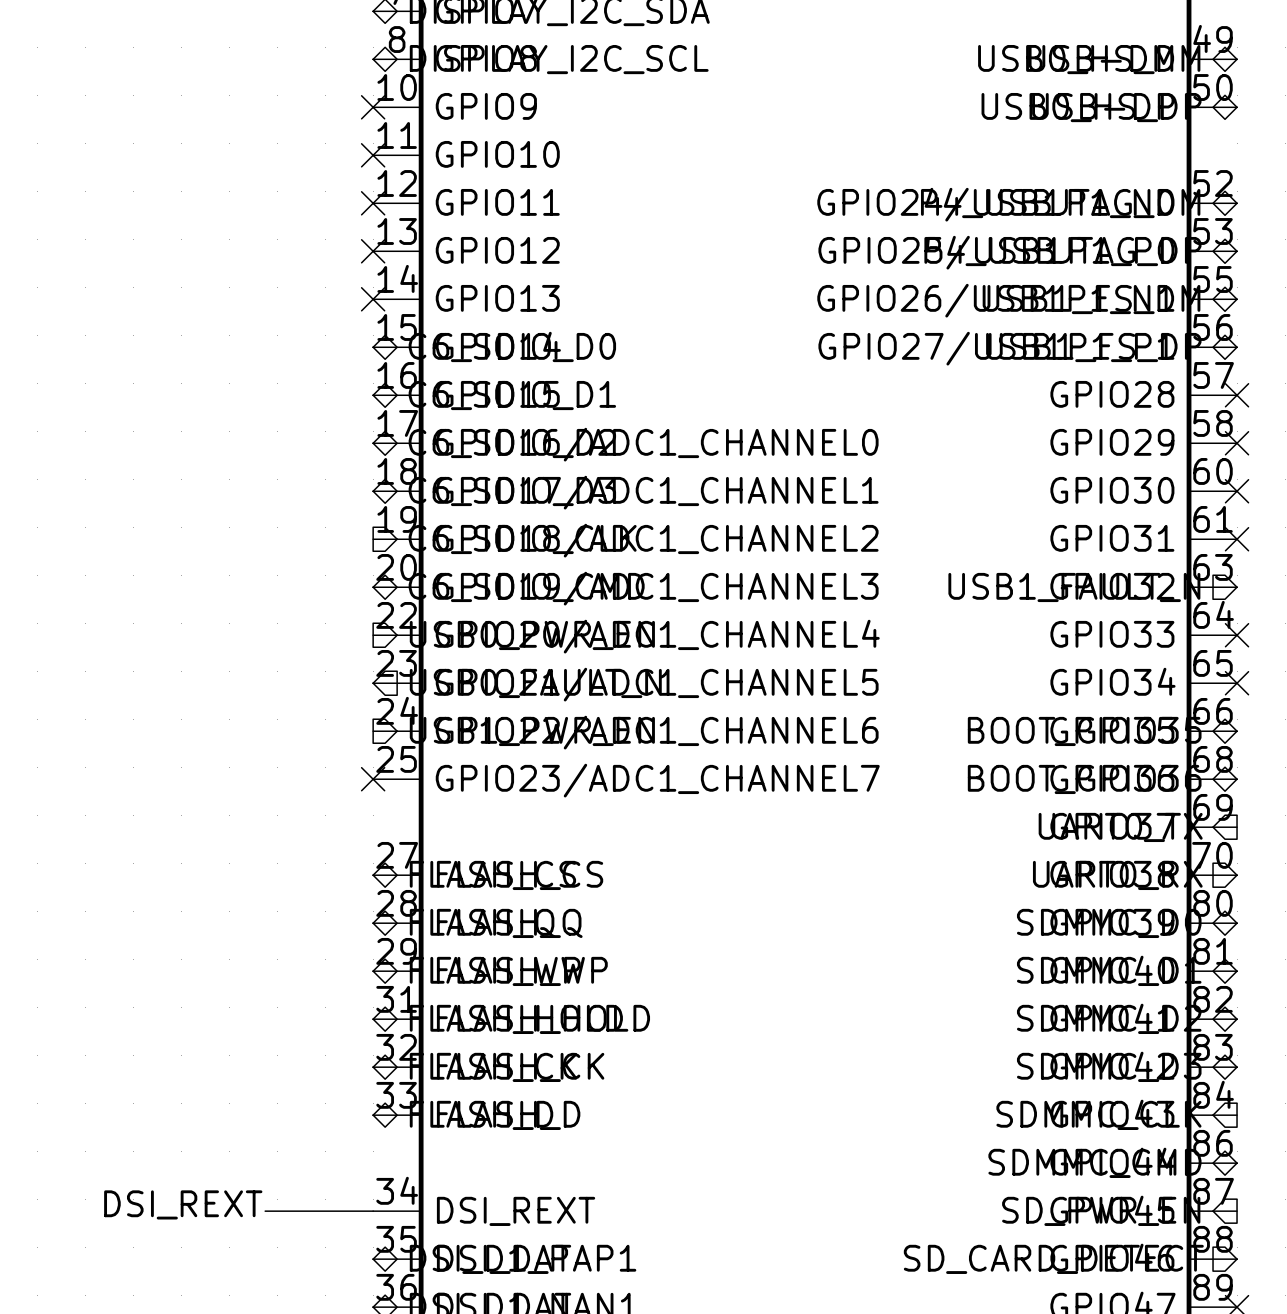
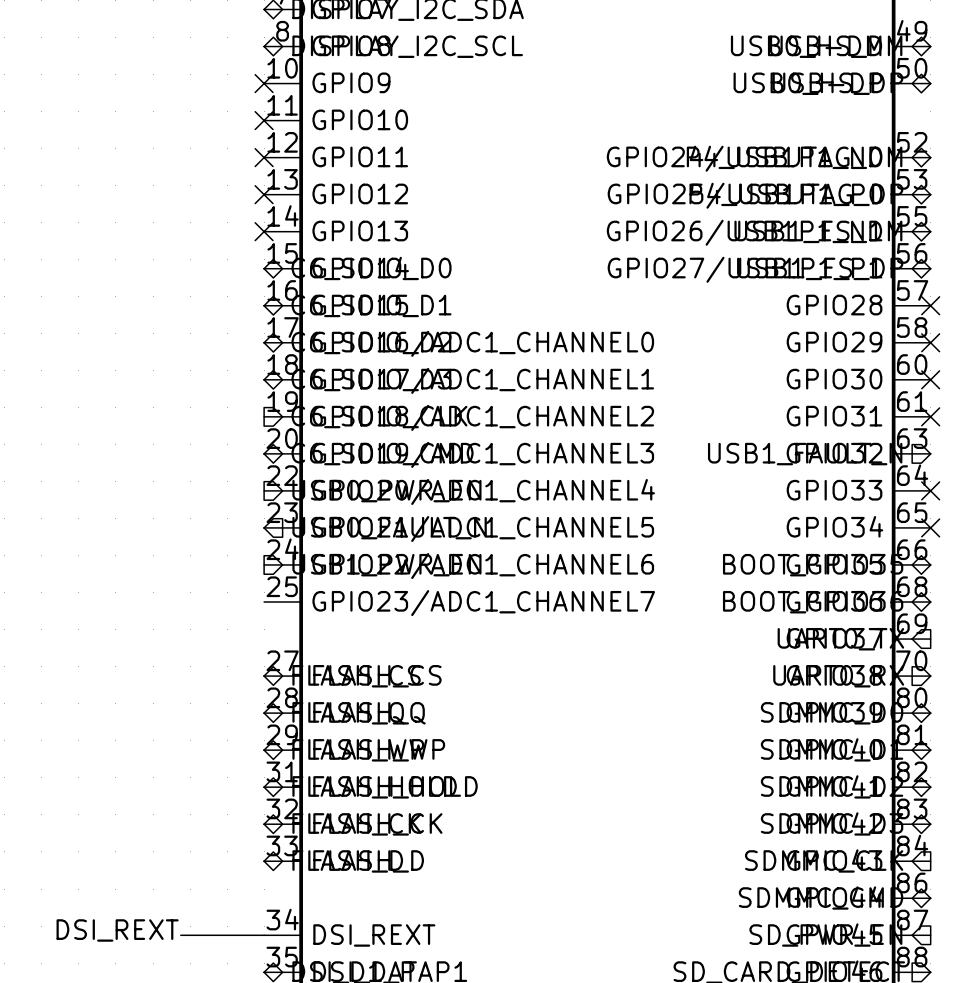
no-connect mark: (373, 779) -> none

